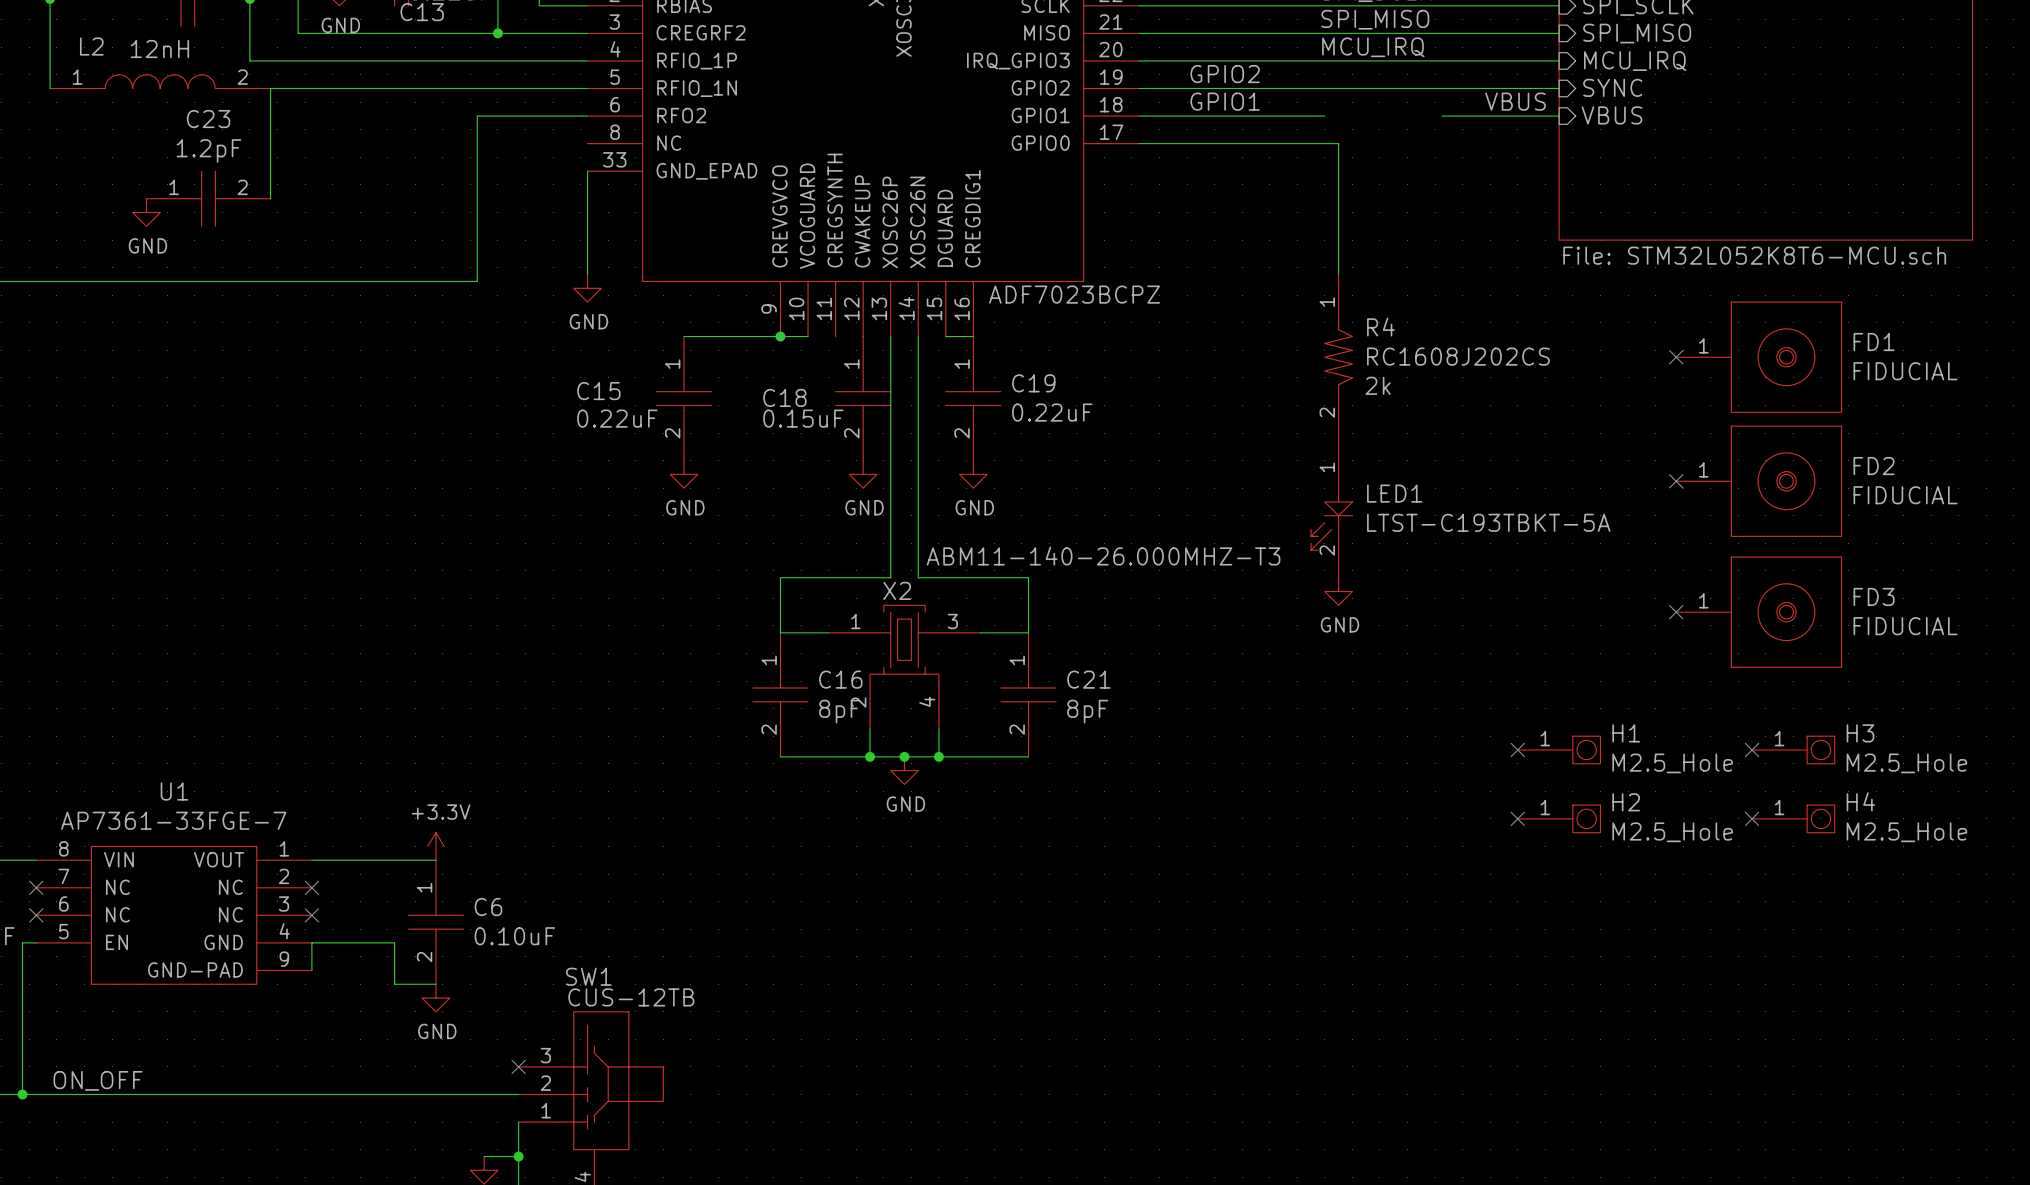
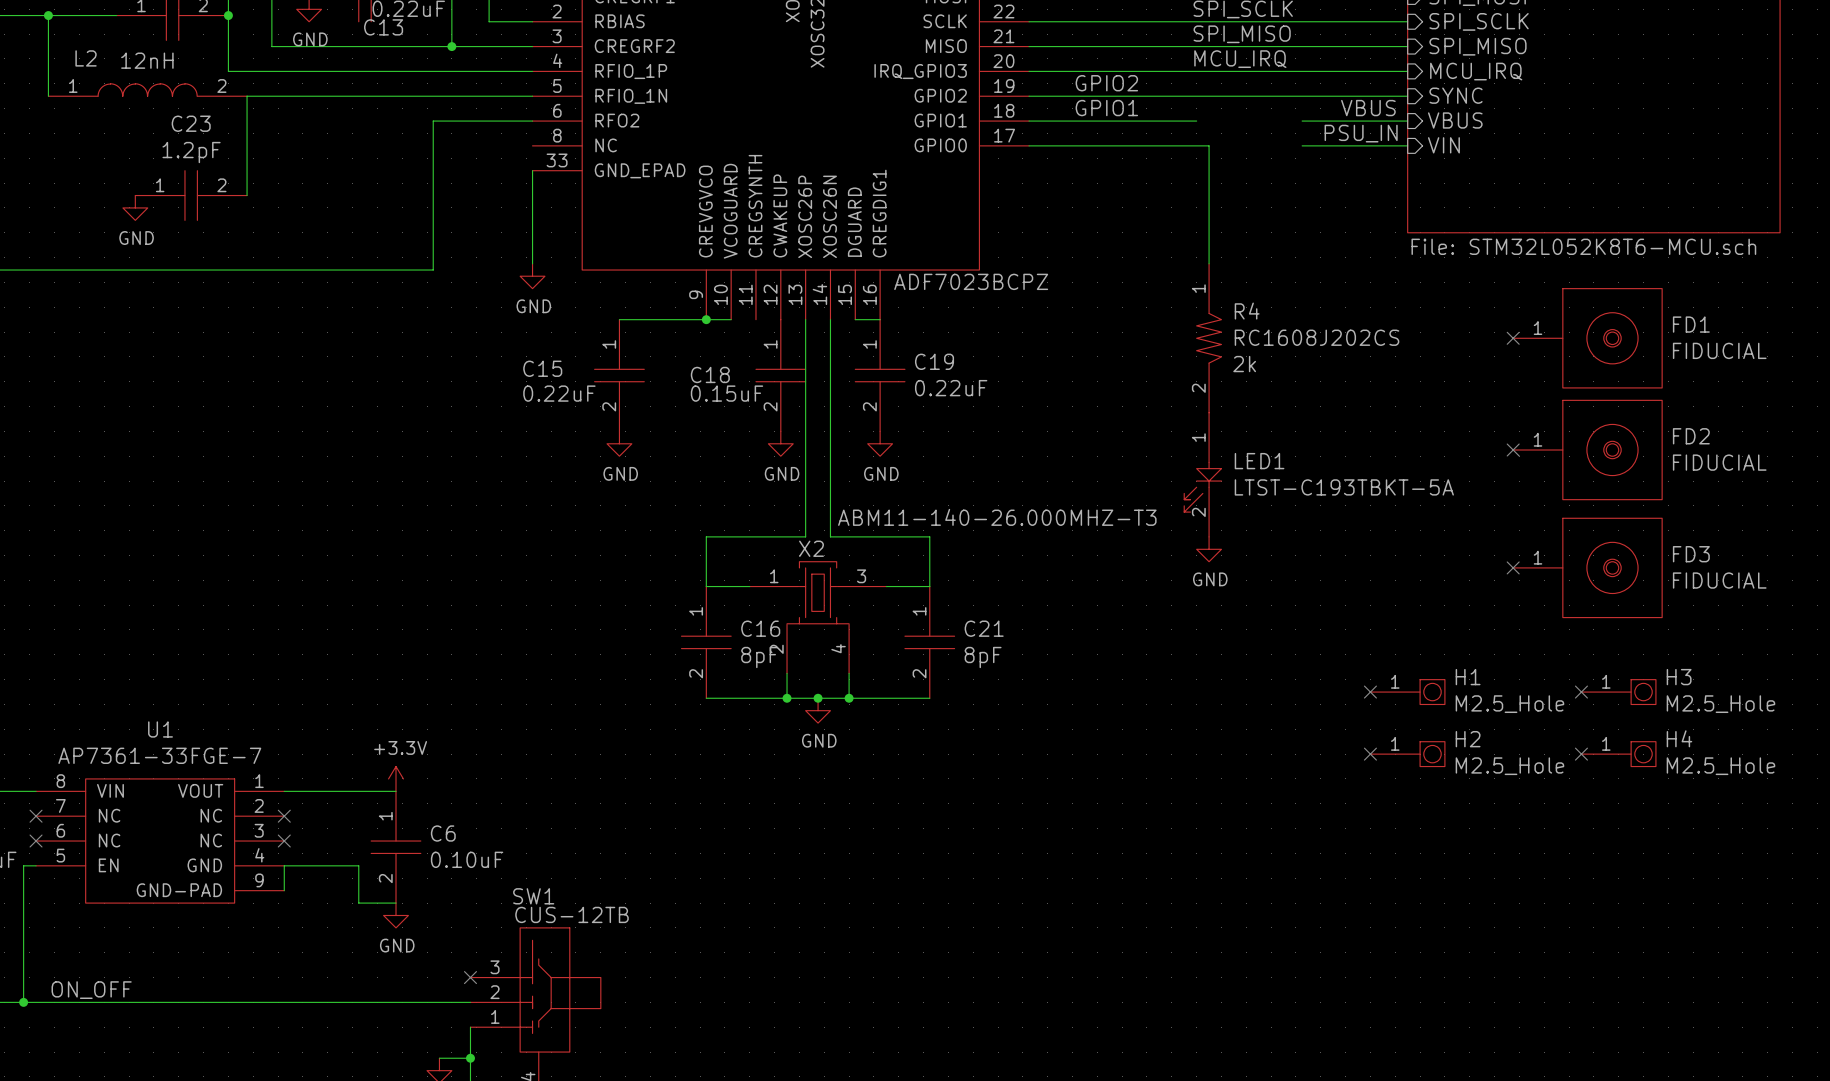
label: none -> PSU_IN (1361, 133)
wire: none -> (1302, 145) (1407, 145)
sheet pin: none -> VIN (1443, 145)

